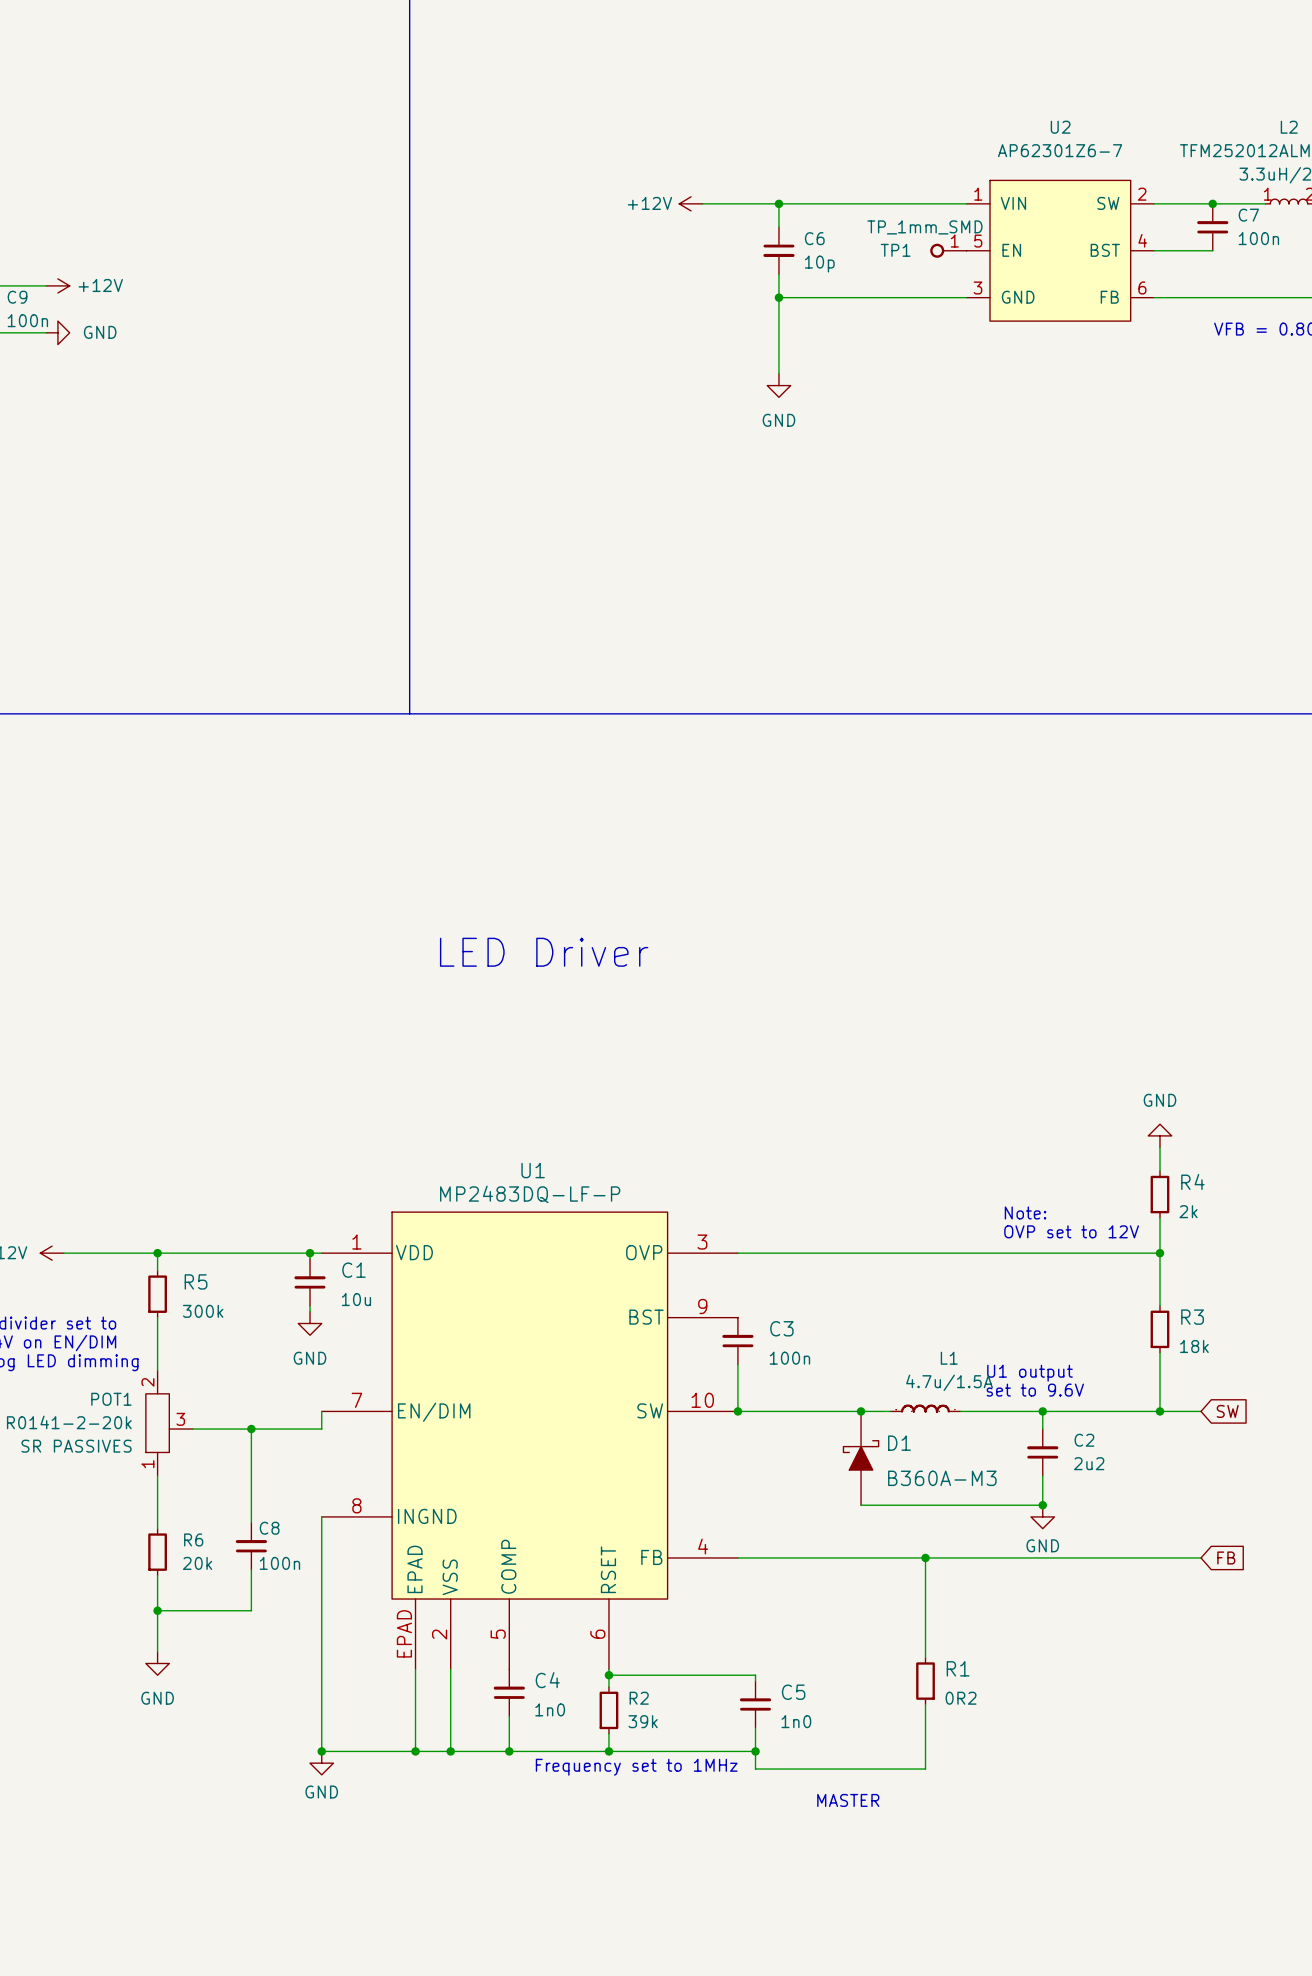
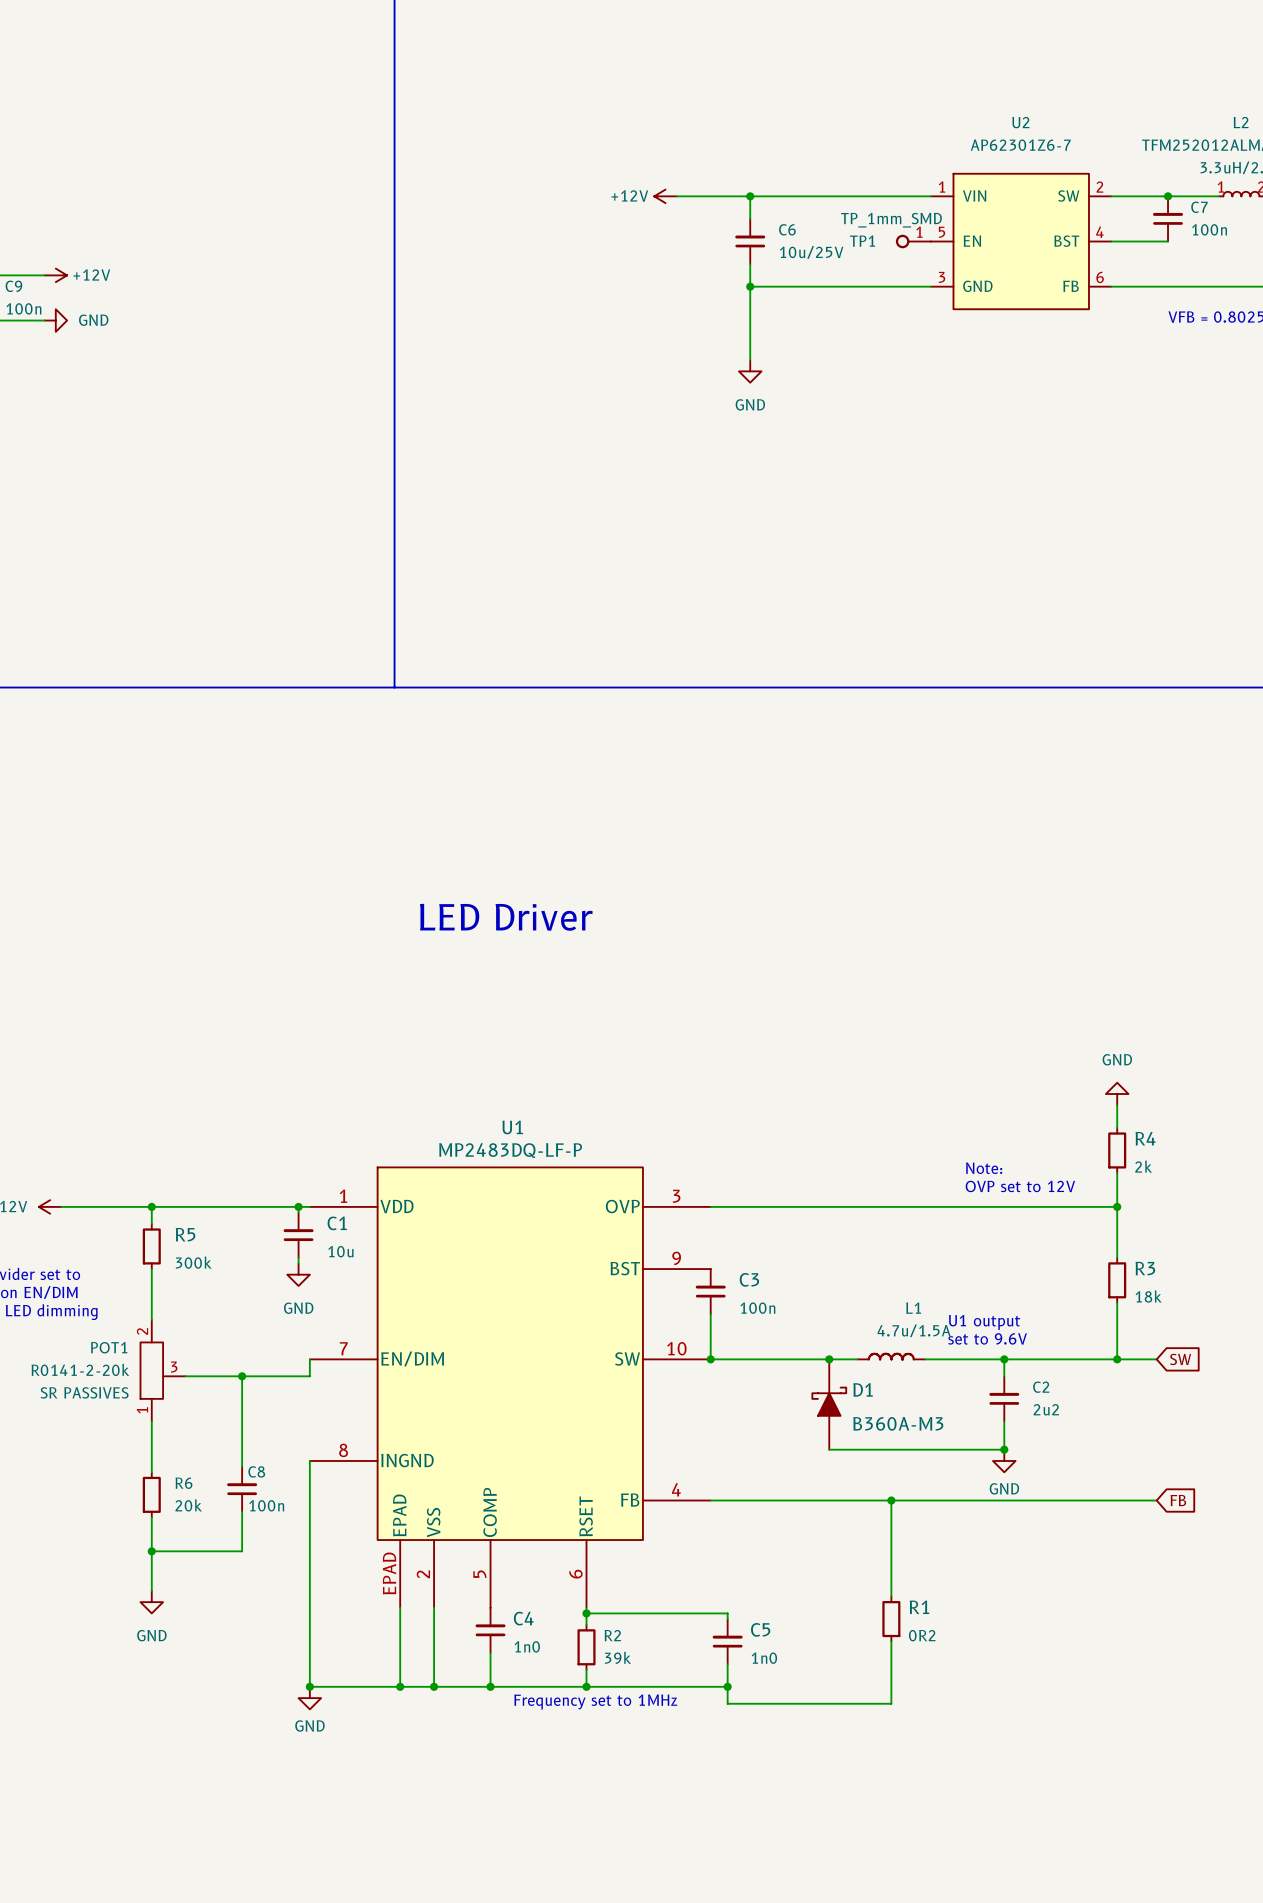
C6 rotation: 0° (778, 250) -> 180° (750, 241)
C6 text: 10p (819, 264) -> 10u/25V (811, 252)
text: MASTER (848, 1800) -> none

